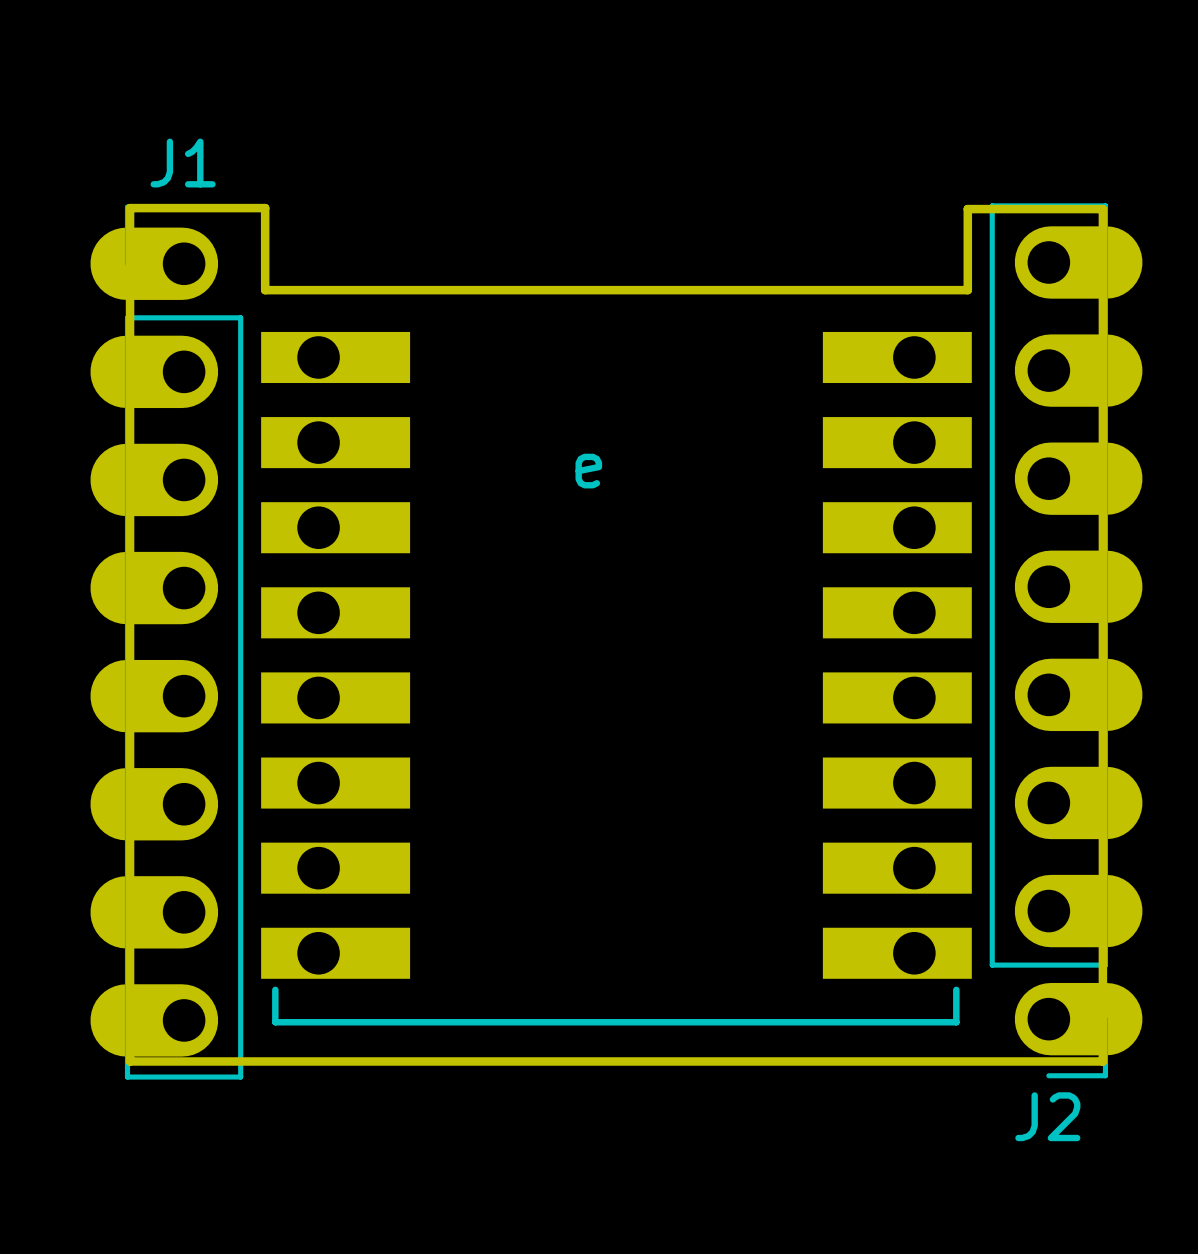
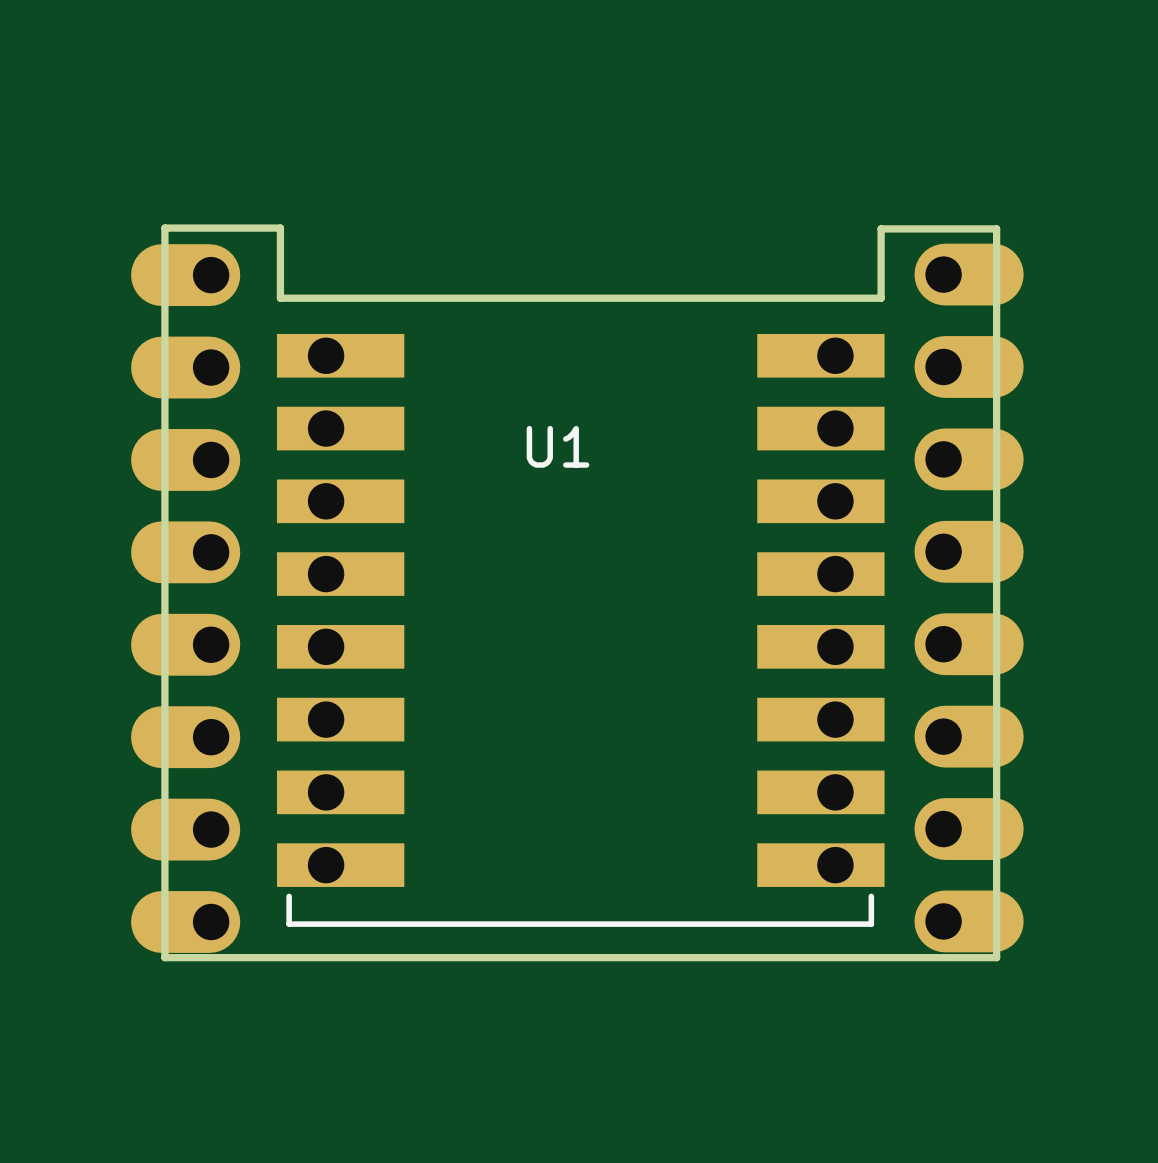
e name: e (588, 471) -> U1 (557, 446)
J2 side: top (1066, 640) -> bottom (969, 598)
J1 side: top (166, 642) -> bottom (185, 598)

